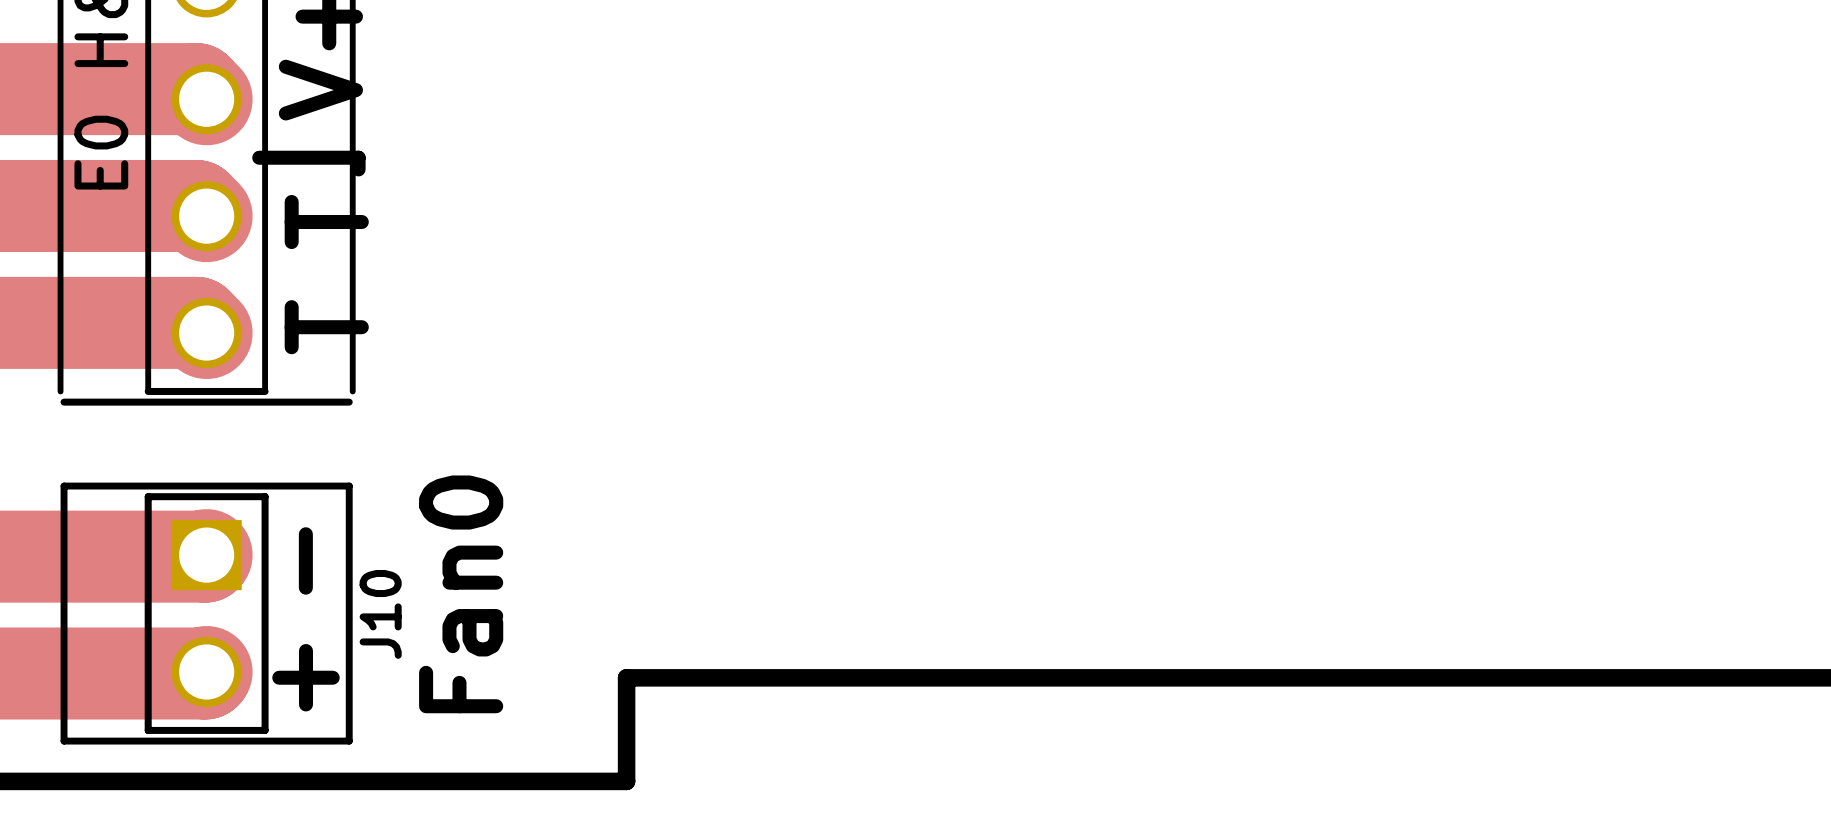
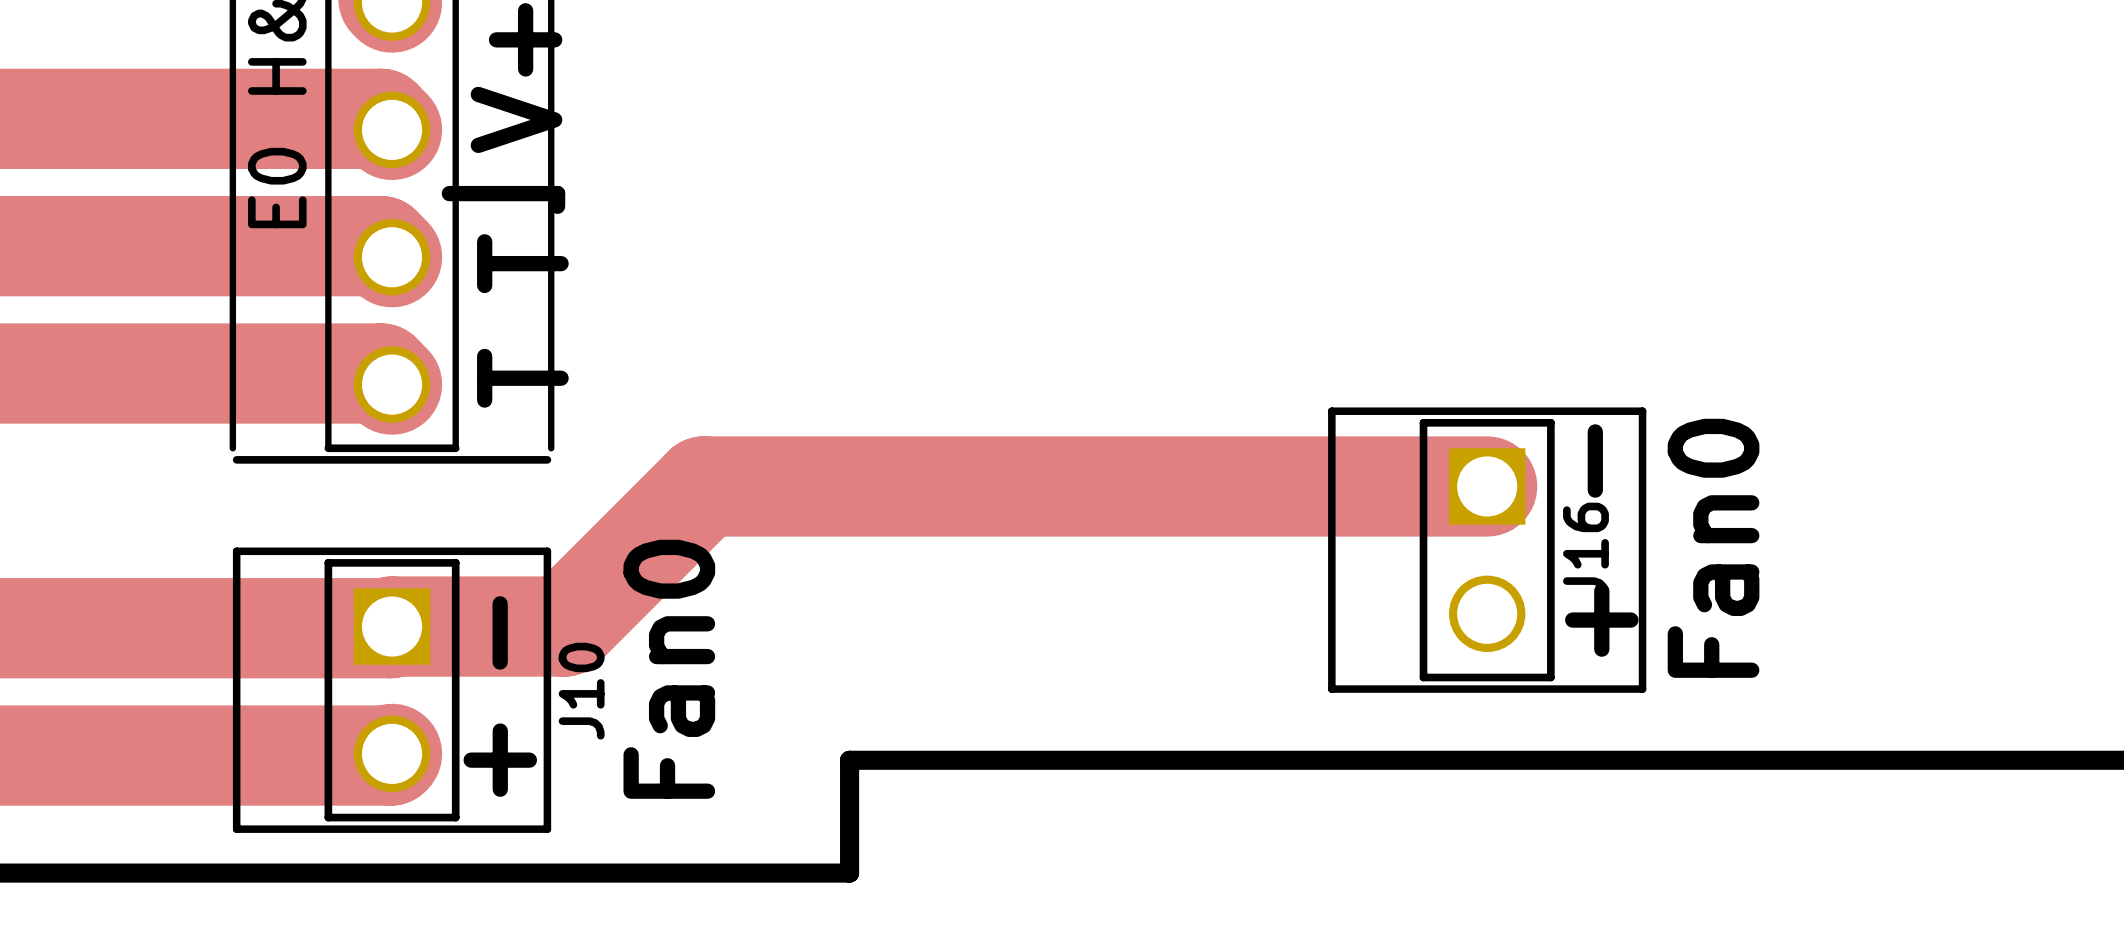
text: none -> - (1595, 461)
top track: none -> (1487, 486) (704, 486) (563, 626) (392, 626)
text: none -> Fan0 (1713, 548)
J16: none -> (1487, 550)
text: none -> + (1601, 620)

